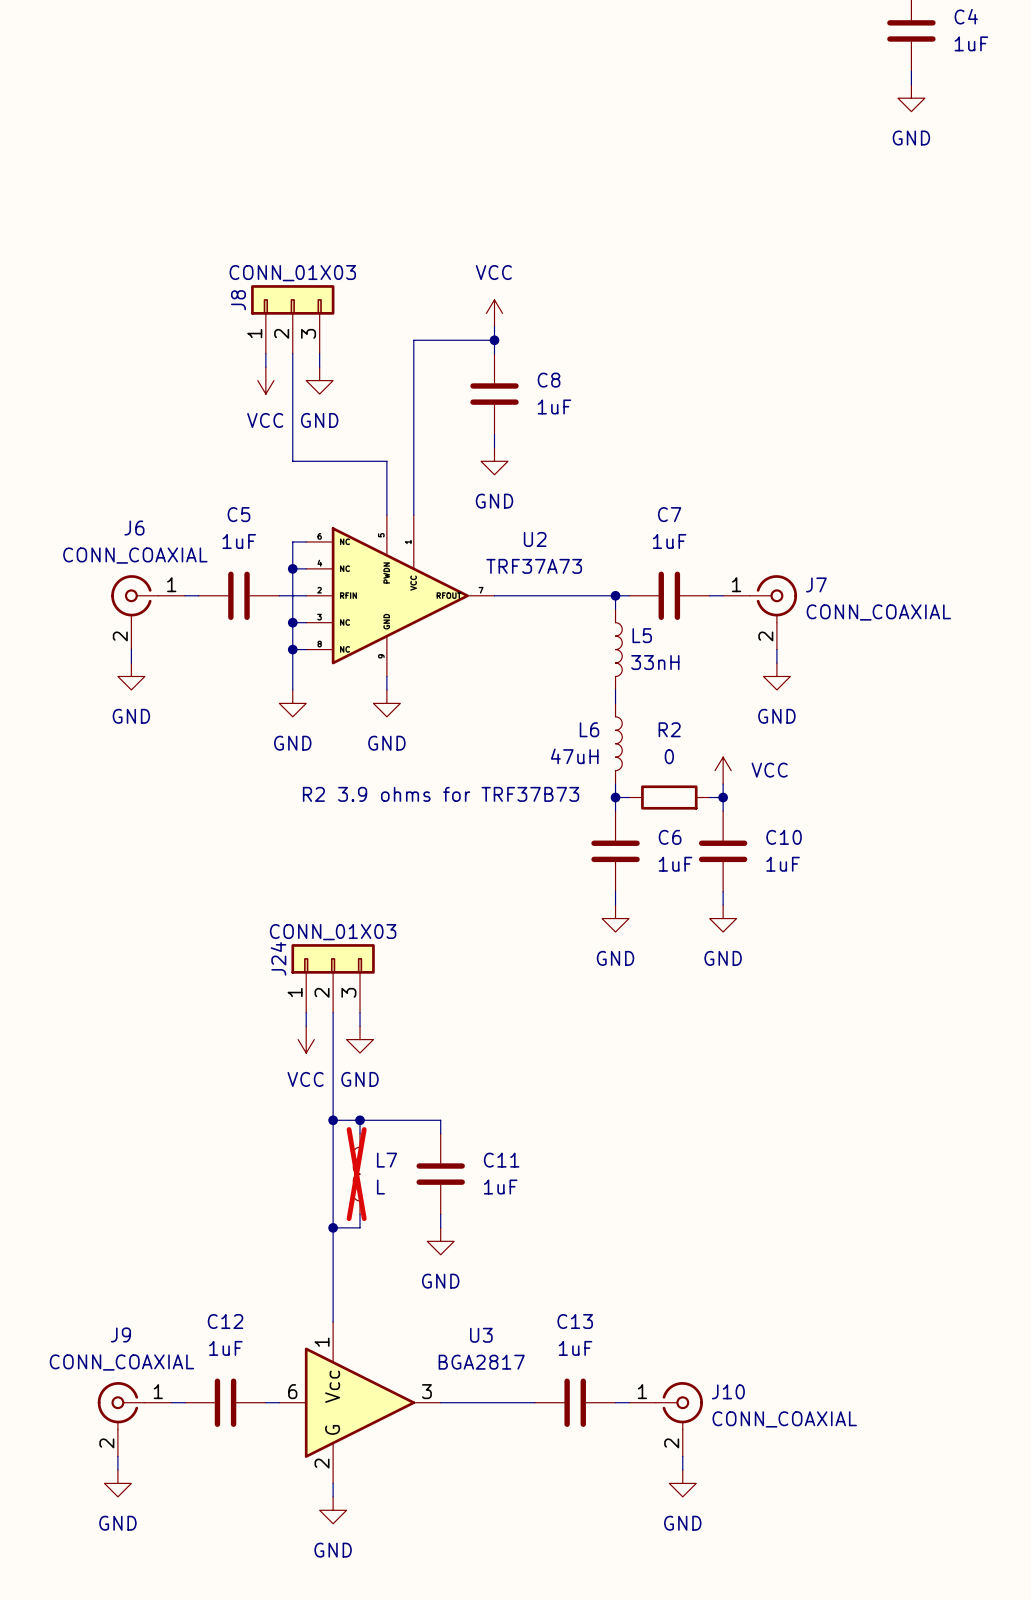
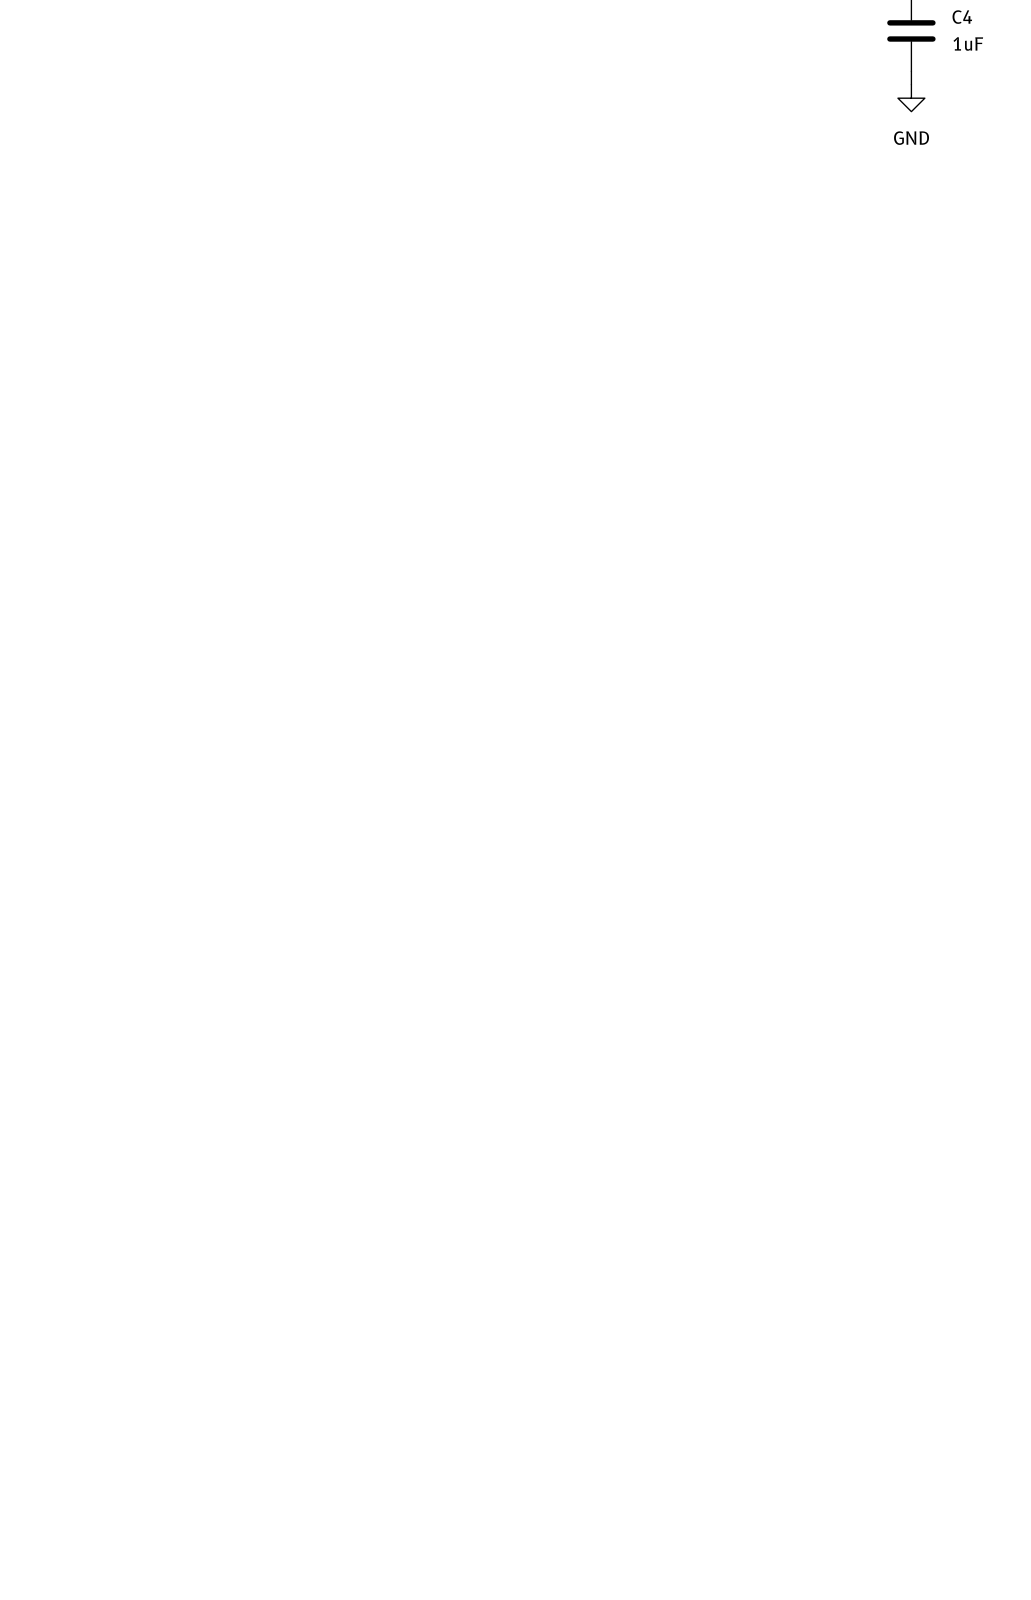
power symbol: VCC (494, 313) -> none
J8: CONN_01X03 (292, 319) -> none
wire: (494, 326) (494, 353) -> none
wire: (494, 340) (413, 340) (413, 515) -> none
junction: (494, 340) -> none
wire: (265, 353) (265, 367) -> none
wire: (292, 353) (292, 461) (386, 461) (386, 515) -> none
wire: (319, 353) (319, 367) -> none
power symbol: VCC (265, 380) -> none
power symbol: GND (319, 380) -> none
C8: 1uF (494, 394) -> none
wire: (494, 434) (494, 447) -> none
power symbol: GND (494, 461) -> none
wire: (306, 541) (292, 541) (292, 689) -> none
wire: (292, 568) (306, 568) -> none
junction: (292, 568) -> none
wire: (185, 595) (198, 595) -> none
C5: 1uF (238, 595) -> none
wire: (279, 595) (306, 595) -> none
U2: TRF37A73 (400, 595) -> none
wire: (494, 595) (628, 595) -> none
wire: (615, 595) (615, 609) -> none
junction: (615, 595) -> none
C7: 1uF (669, 595) -> none
wire: (709, 595) (723, 595) -> none
J6: CONN_COAXIAL (148, 612) -> none
J7: CONN_COAXIAL (760, 612) -> none
wire: (292, 622) (306, 622) -> none
junction: (292, 622) -> none
wire: (131, 649) (131, 663) -> none
wire: (292, 649) (306, 649) -> none
junction: (292, 649) -> none
L5: 33nH (618, 649) -> none
wire: (776, 649) (776, 663) -> none
power symbol: GND (131, 676) -> none
wire: (386, 676) (386, 689) -> none
power symbol: GND (776, 676) -> none
wire: (615, 689) (615, 703) -> none
power symbol: GND (292, 703) -> none
power symbol: GND (386, 703) -> none
L6: 47uH (618, 743) -> none
power symbol: VCC (723, 770) -> none
wire: (615, 784) (615, 810) -> none
wire: (723, 784) (723, 810) -> none
text: R2 3.9 ohms for TRF37B73 (441, 794) -> none
wire: (615, 797) (628, 797) -> none
junction: (615, 797) -> none
R2: 0 (669, 797) -> none
wire: (709, 797) (723, 797) -> none
junction: (723, 797) -> none
C6: 1uF (615, 851) -> none
C10: 1uF (723, 851) -> none
wire: (615, 891) (615, 905) -> none
wire: (723, 891) (723, 905) -> none
power symbol: GND (615, 918) -> none
power symbol: GND (723, 918) -> none
J24: CONN_01X03 (333, 978) -> none
wire: (306, 1012) (306, 1026) -> none
wire: (333, 1012) (333, 1322) -> none
wire: (360, 1012) (360, 1026) -> none
power symbol: VCC (306, 1039) -> none
power symbol: GND (360, 1039) -> none
wire: (333, 1120) (440, 1120) (440, 1133) -> none
junction: (333, 1120) -> none
wire: (360, 1120) (360, 1133) -> none
junction: (360, 1120) -> none
L7: L (356, 1174) -> none
C11: 1uF (440, 1174) -> none
wire: (360, 1214) (360, 1227) (333, 1227) -> none
wire: (440, 1214) (440, 1227) -> none
junction: (333, 1227) -> none
power symbol: GND (440, 1241) -> none
wire: (171, 1402) (185, 1402) -> none
C12: 1uF (225, 1402) -> none
wire: (265, 1402) (279, 1402) -> none
U3: BGA2817 (360, 1402) -> none
wire: (440, 1402) (534, 1402) -> none
C13: 1uF (575, 1402) -> none
wire: (615, 1402) (628, 1402) -> none
J9: CONN_COAXIAL (134, 1419) -> none
J10: CONN_COAXIAL (665, 1419) -> none
wire: (117, 1456) (117, 1469) -> none
wire: (682, 1456) (682, 1469) -> none
power symbol: GND (117, 1483) -> none
wire: (333, 1483) (333, 1496) -> none
power symbol: GND (682, 1483) -> none
power symbol: GND (333, 1510) -> none

